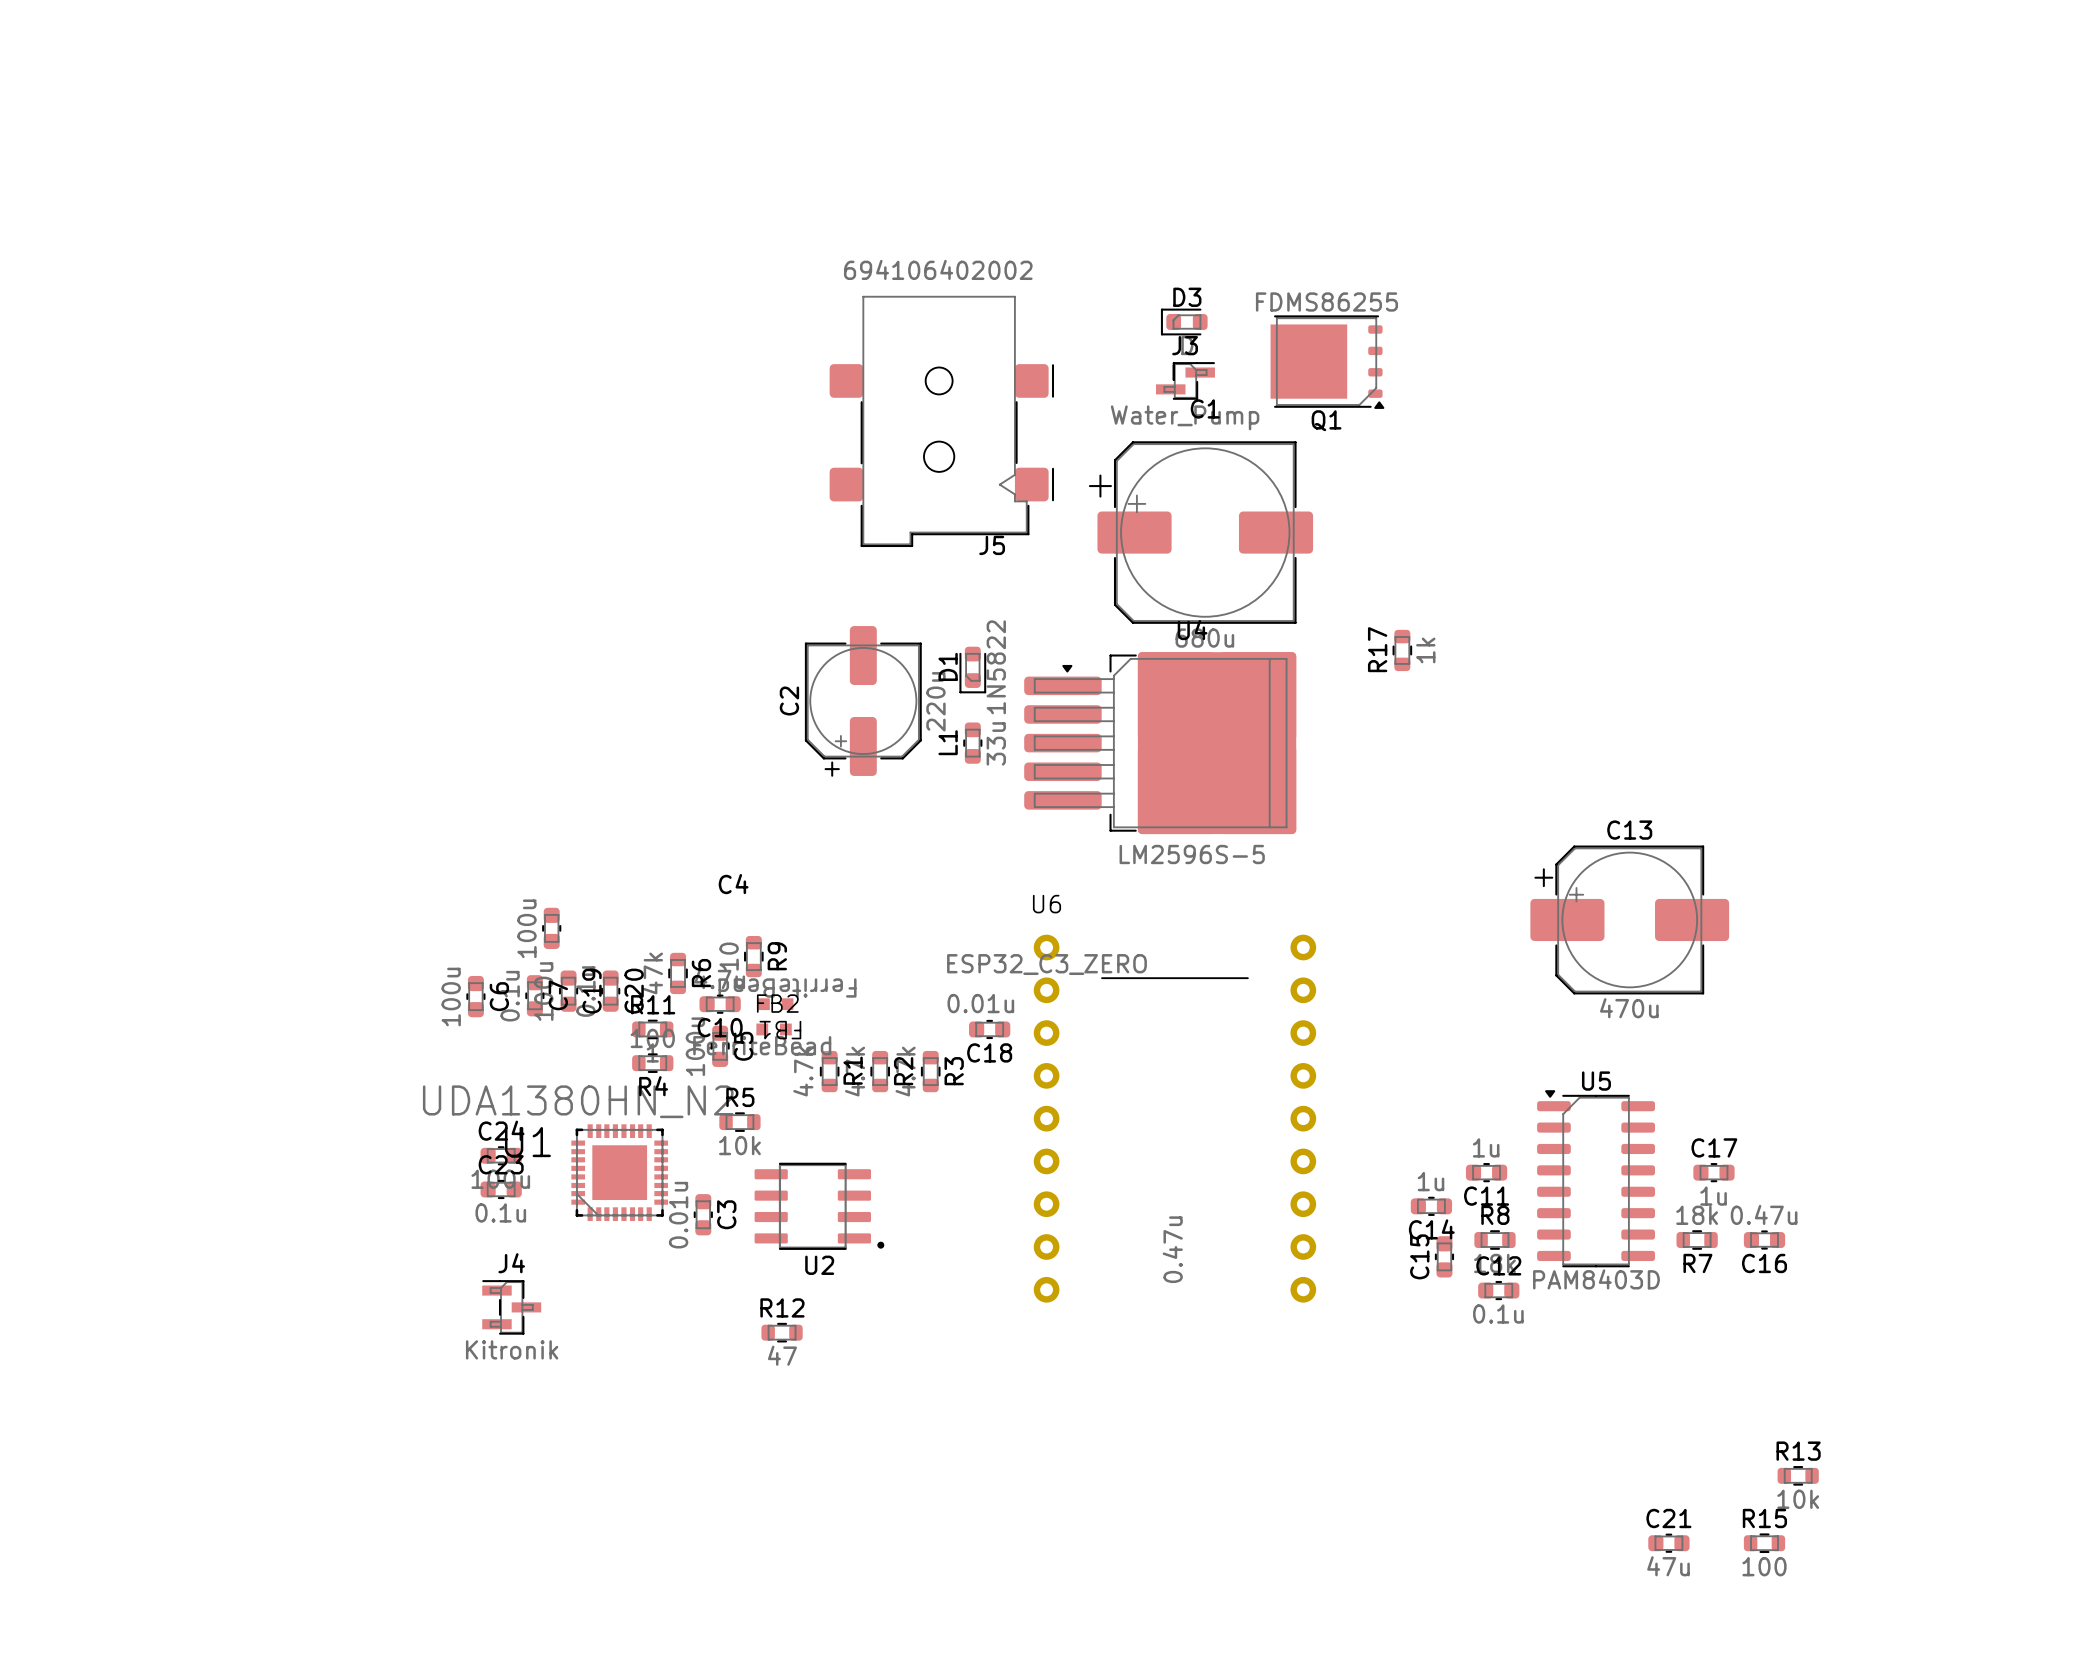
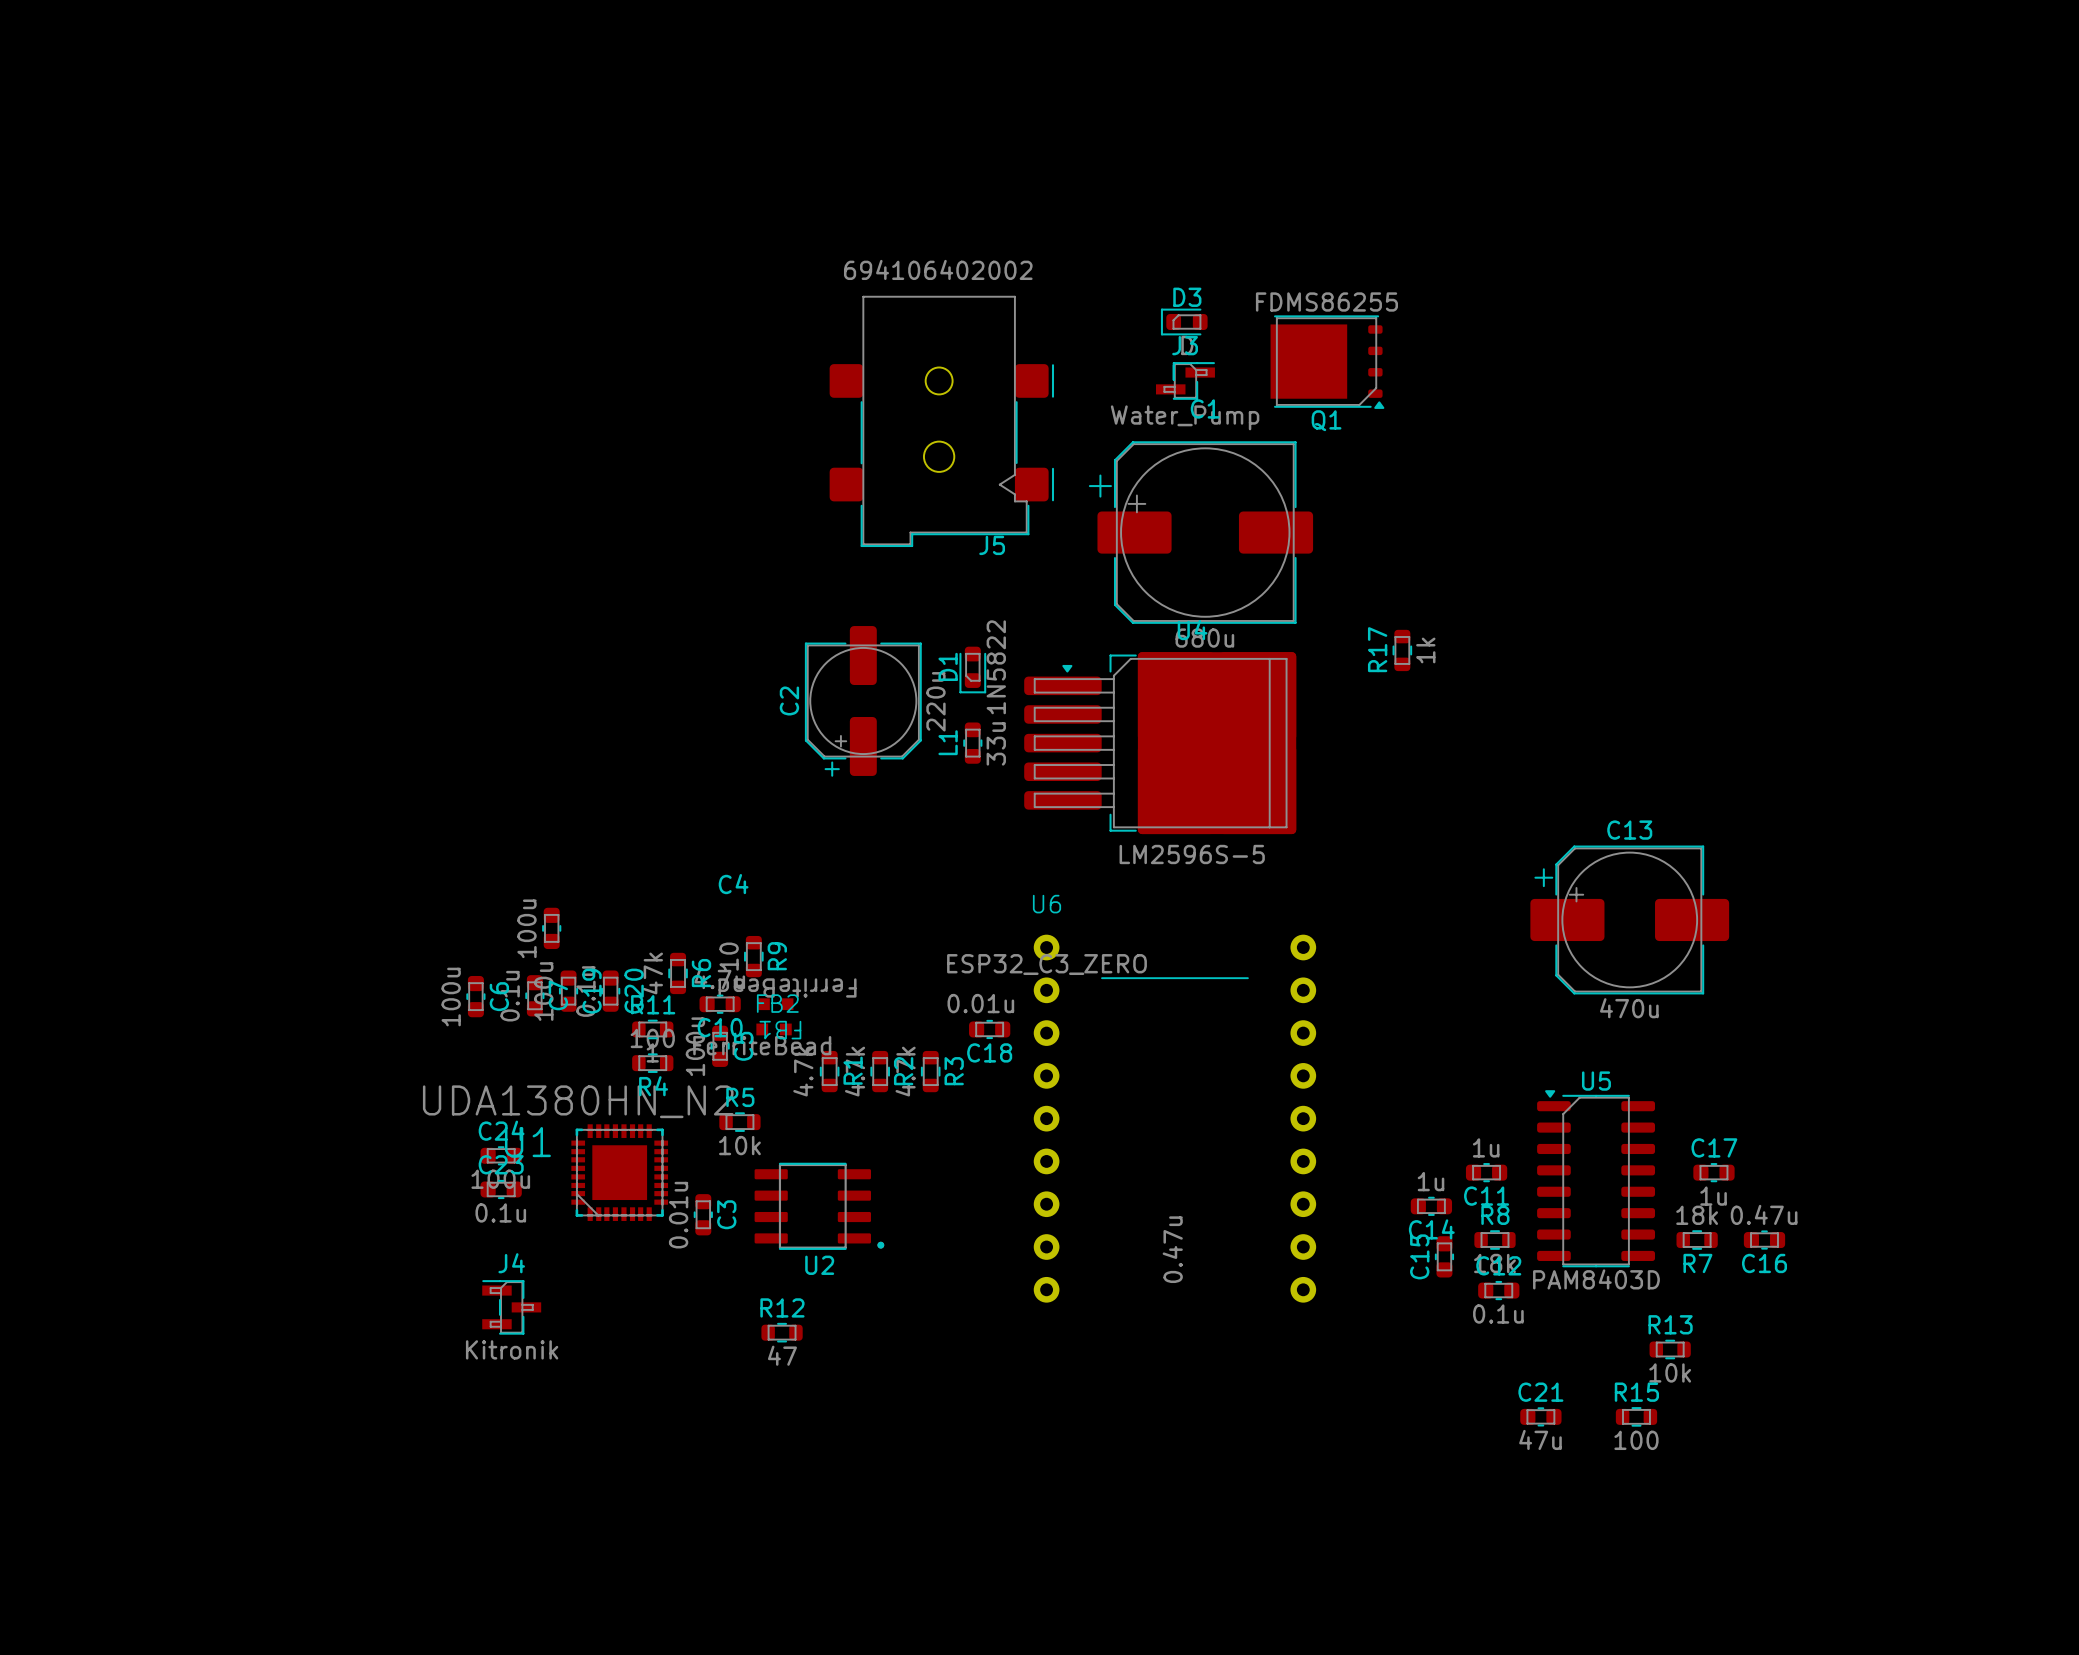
R13 position: (1798, 1475) -> (1670, 1349)
C21 position: (1668, 1543) -> (1540, 1416)
R15 position: (1764, 1543) -> (1636, 1416)

